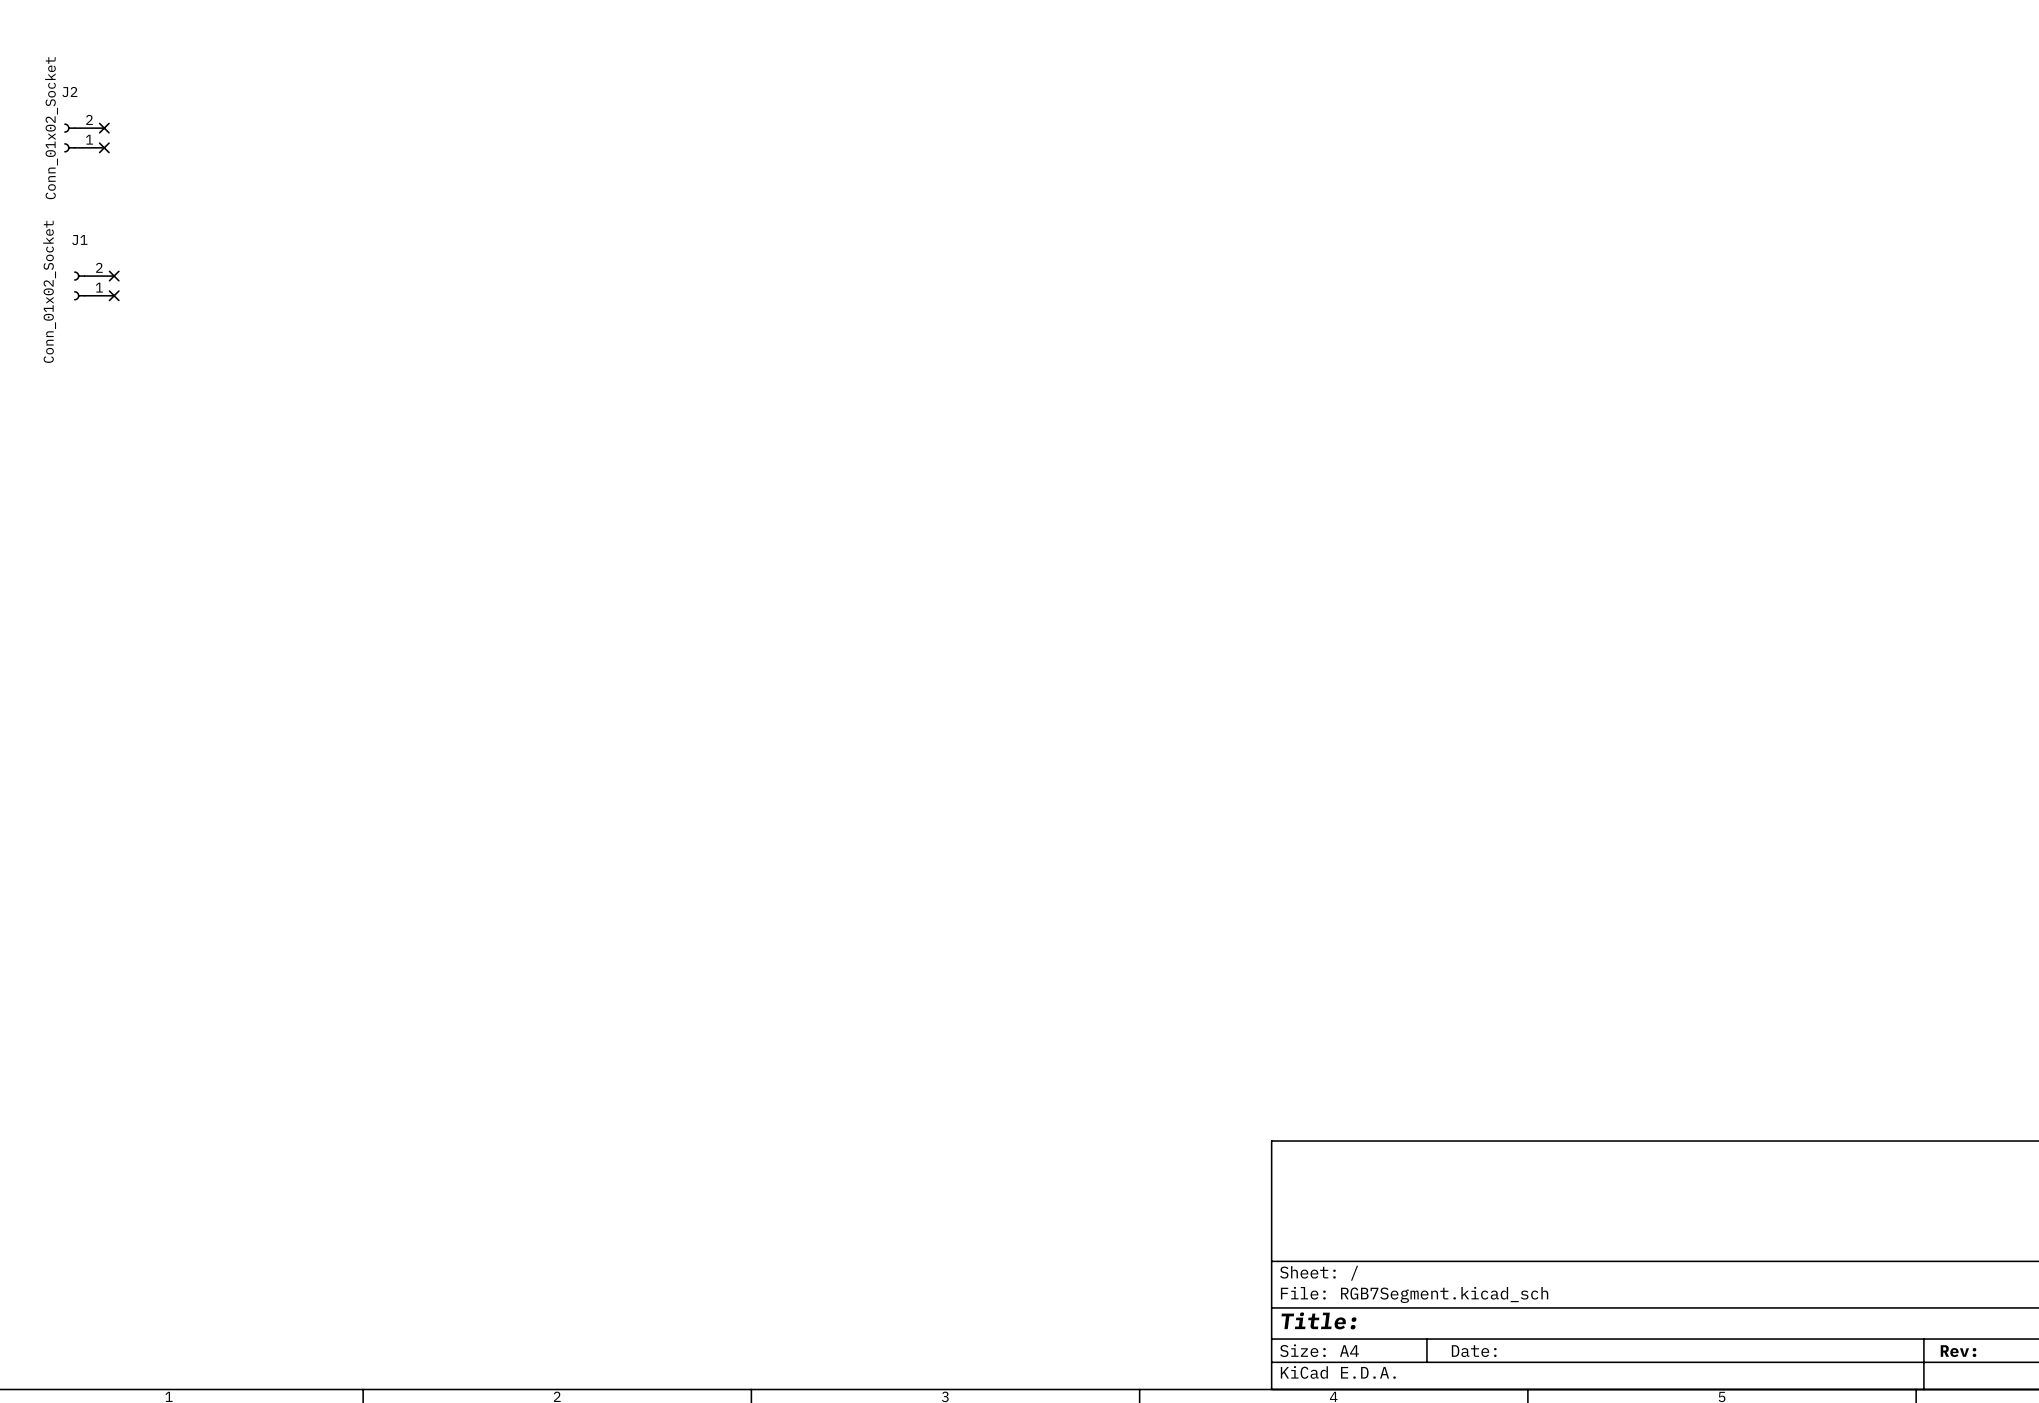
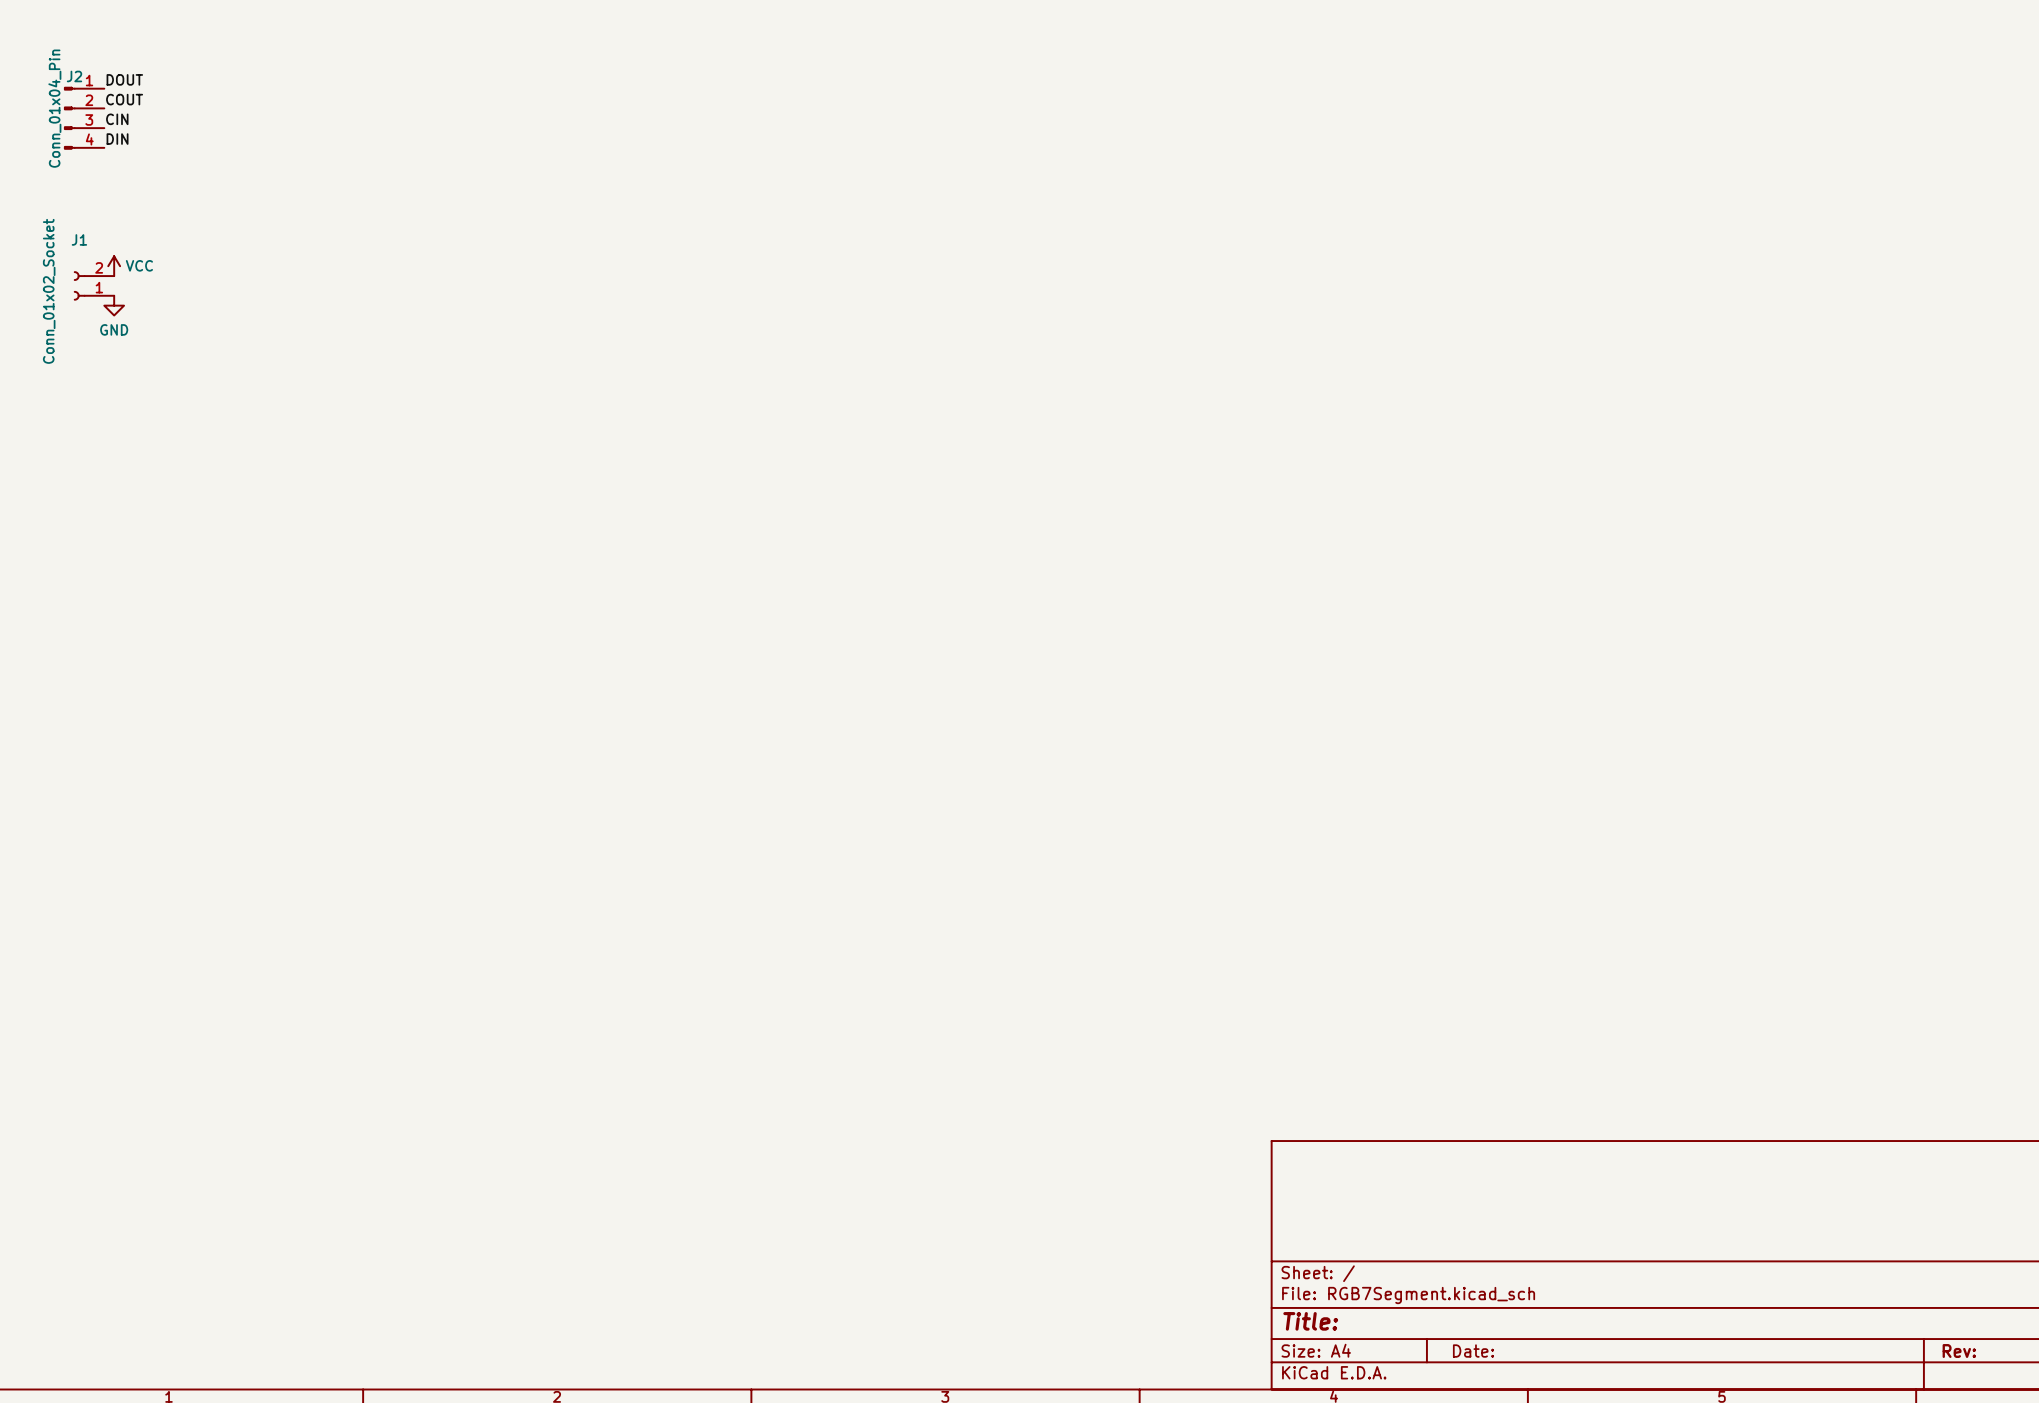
label: none -> DOUT (124, 79)
label: none -> COUT (124, 99)
label: none -> CIN (117, 119)
J2 symbol: [64, 123, 105, 153] -> [64, 87, 105, 150]
J2 value: Conn_01x02_Socket (51, 128) -> Conn_01x04_Pin (54, 108)
no-connect mark: (104, 128) -> none
label: none -> DIN (117, 139)
no-connect mark: (104, 147) -> none
power symbol: none -> VCC (114, 266)
no-connect mark: (114, 276) -> none
no-connect mark: (114, 295) -> none
power symbol: none -> GND (114, 305)

